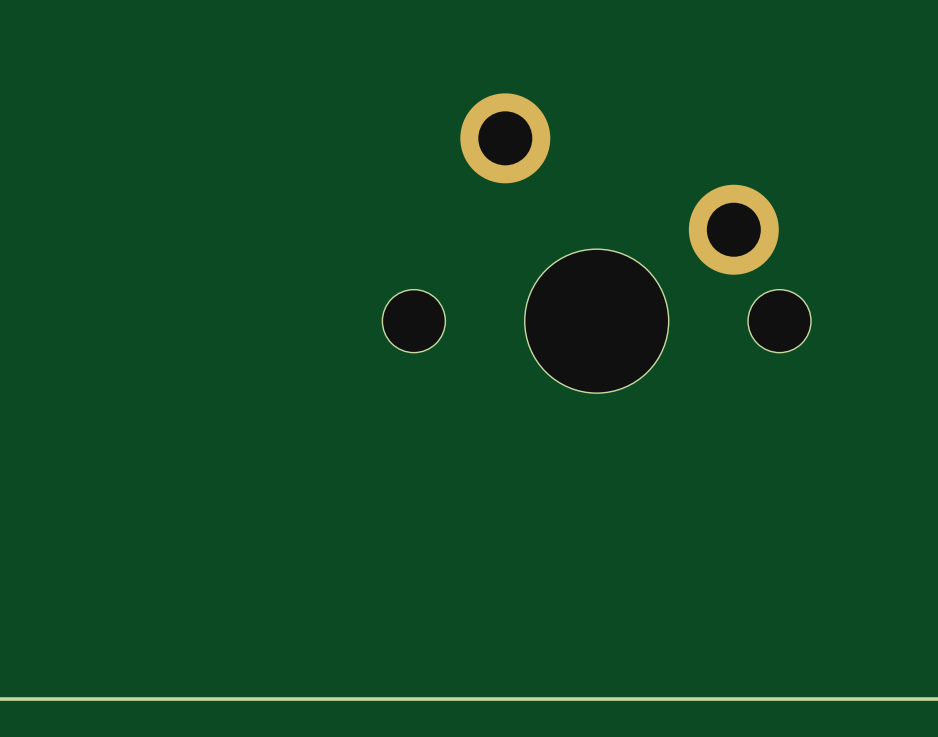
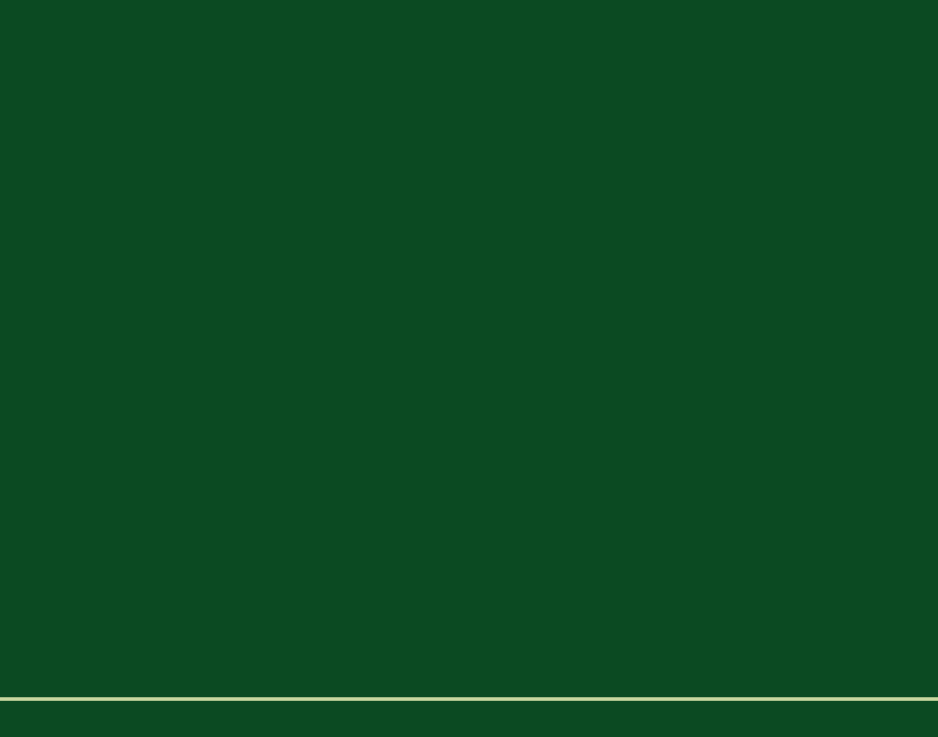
part: (596, 243) -> none

